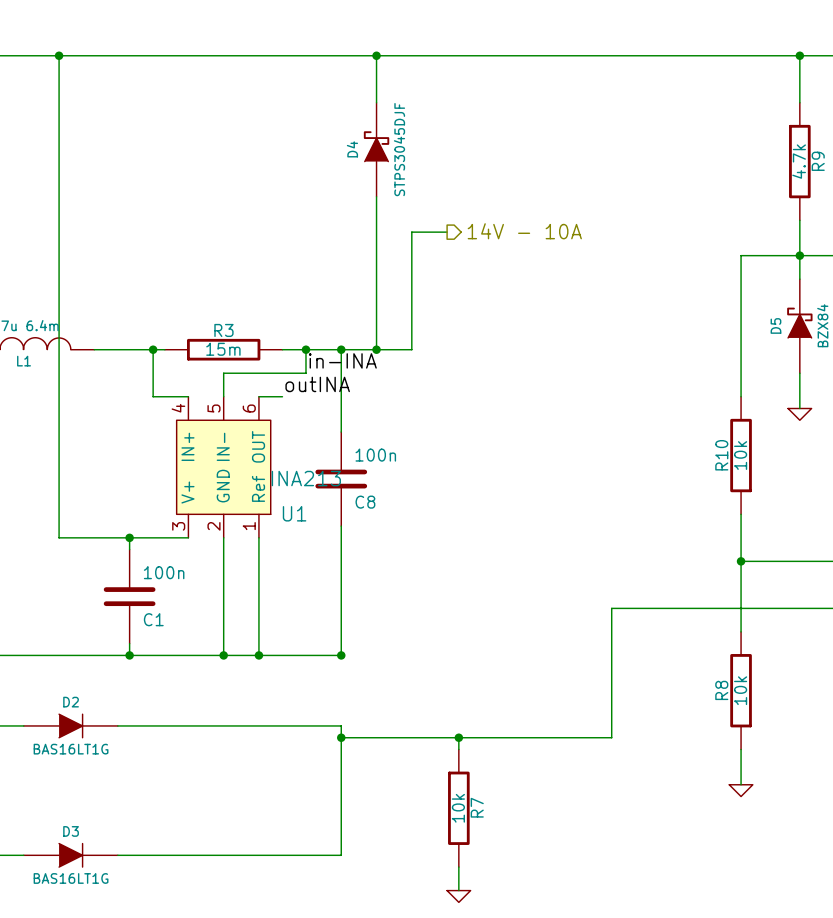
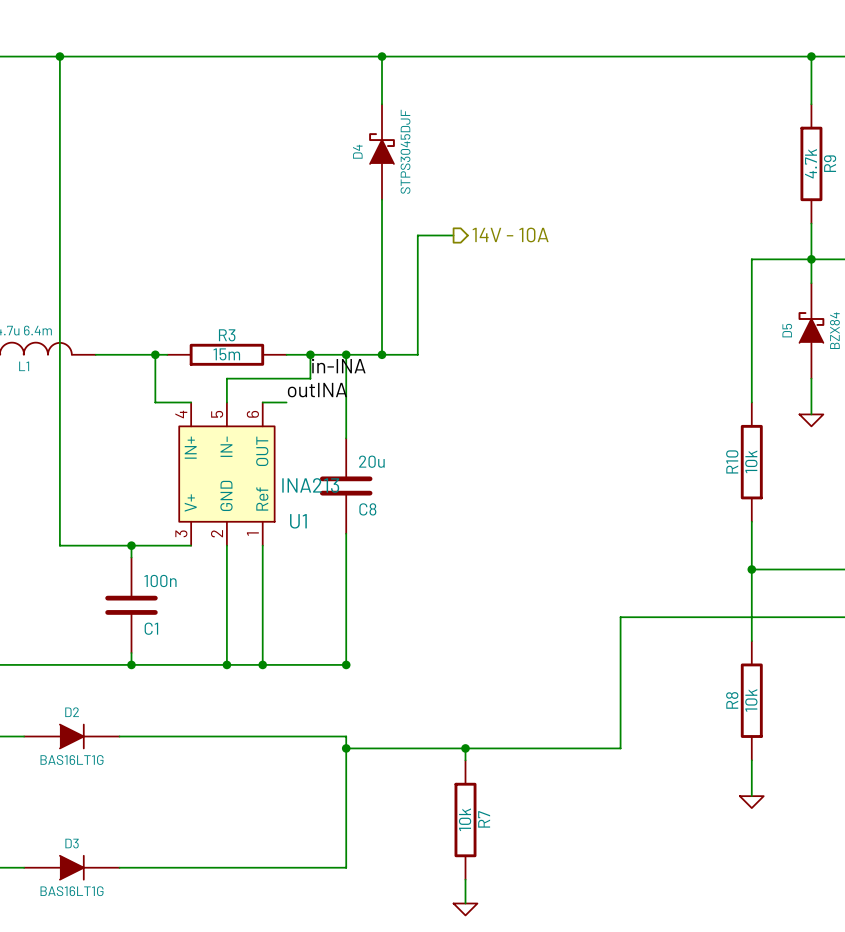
C8 value: 100n (375, 455) -> 20u (371, 461)

